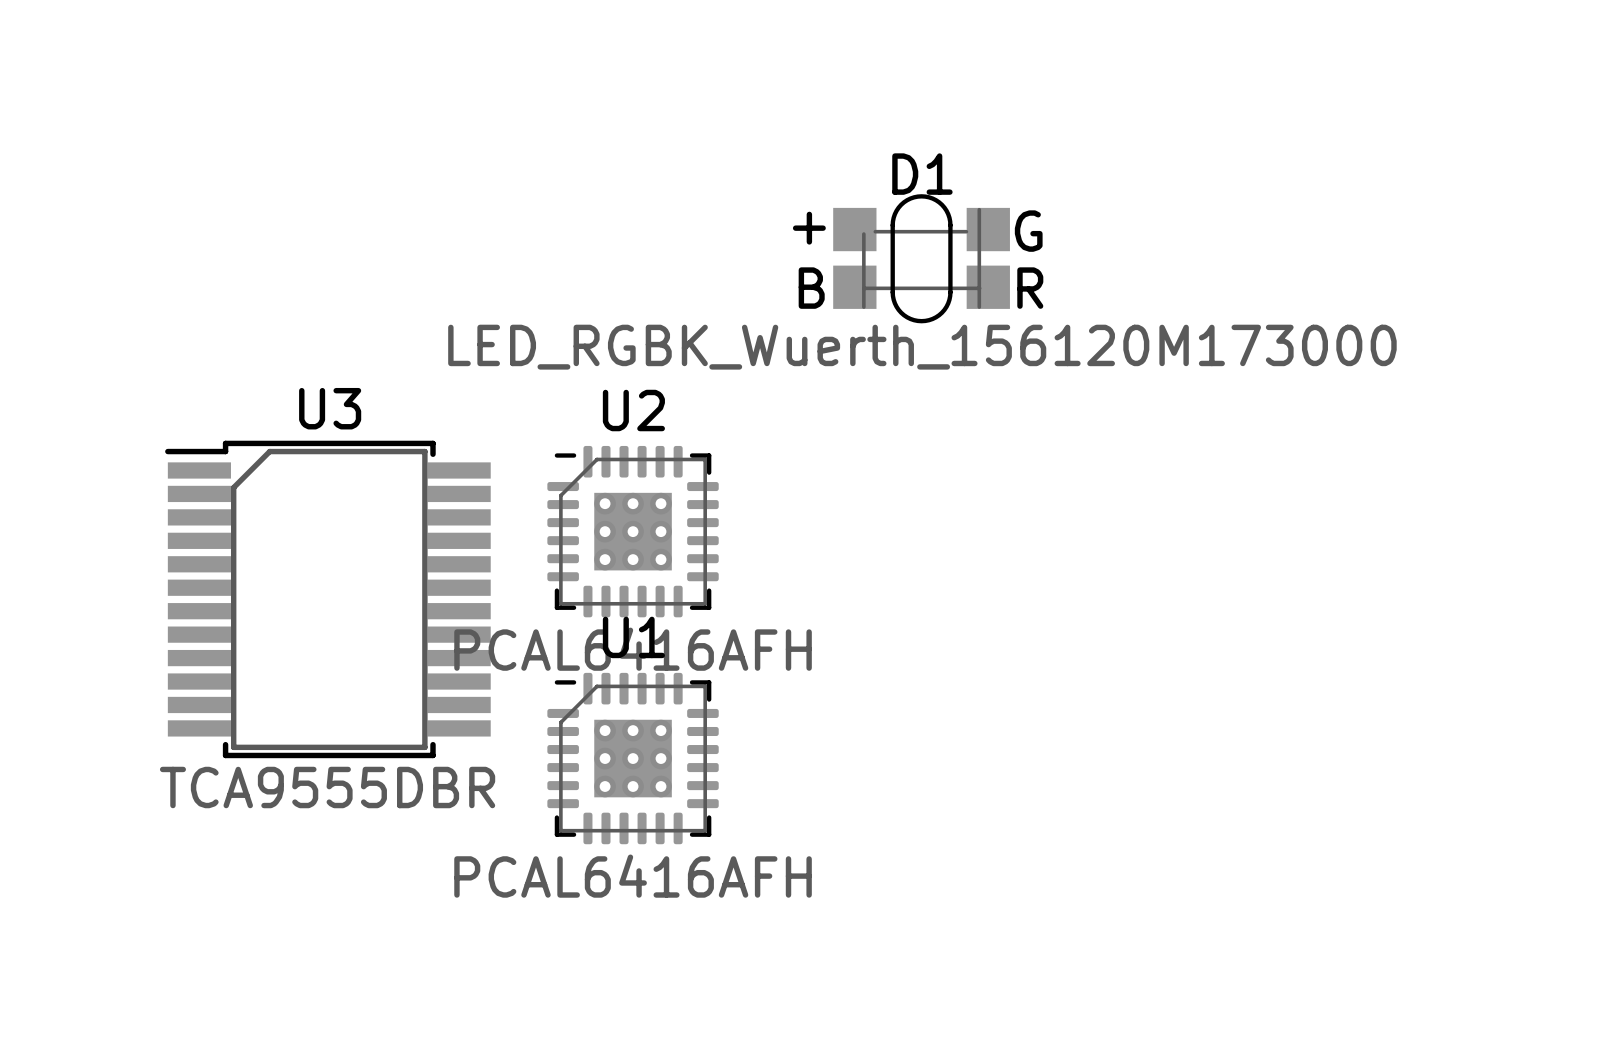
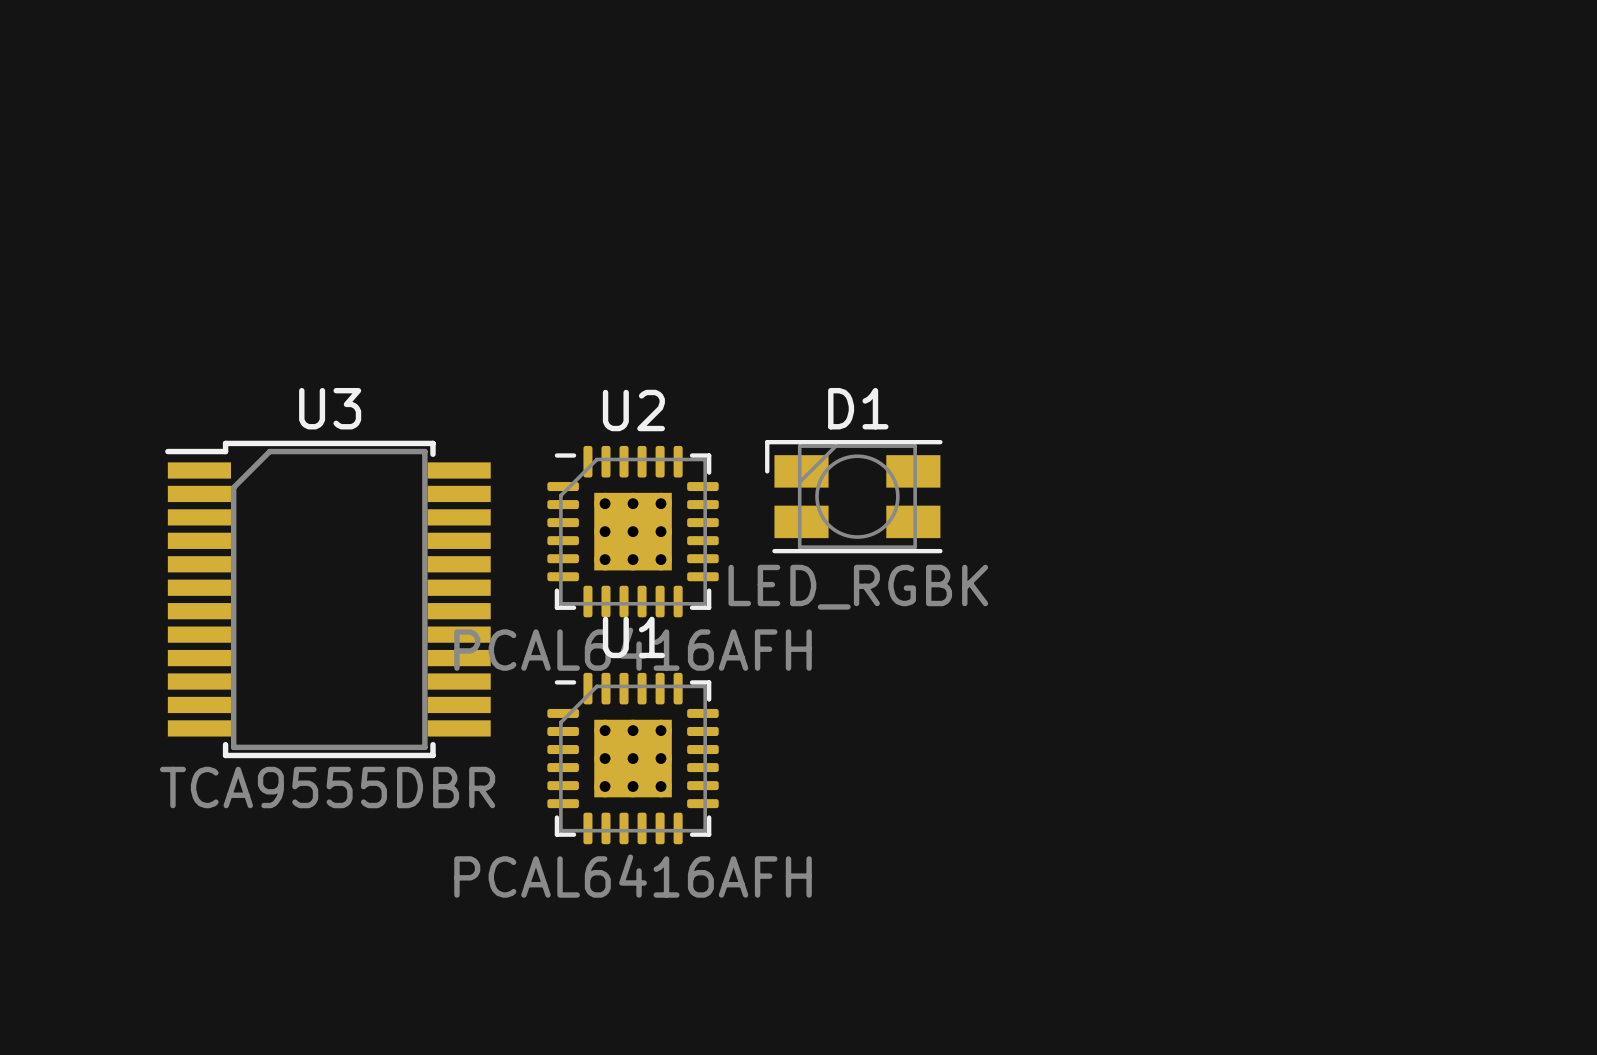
D1 footprint: [833, 194, 1010, 324] -> [765, 440, 943, 554]
D1 value: LED_RGBK_Wuerth_156120M173000 (922, 347) -> LED_RGBK (858, 587)

